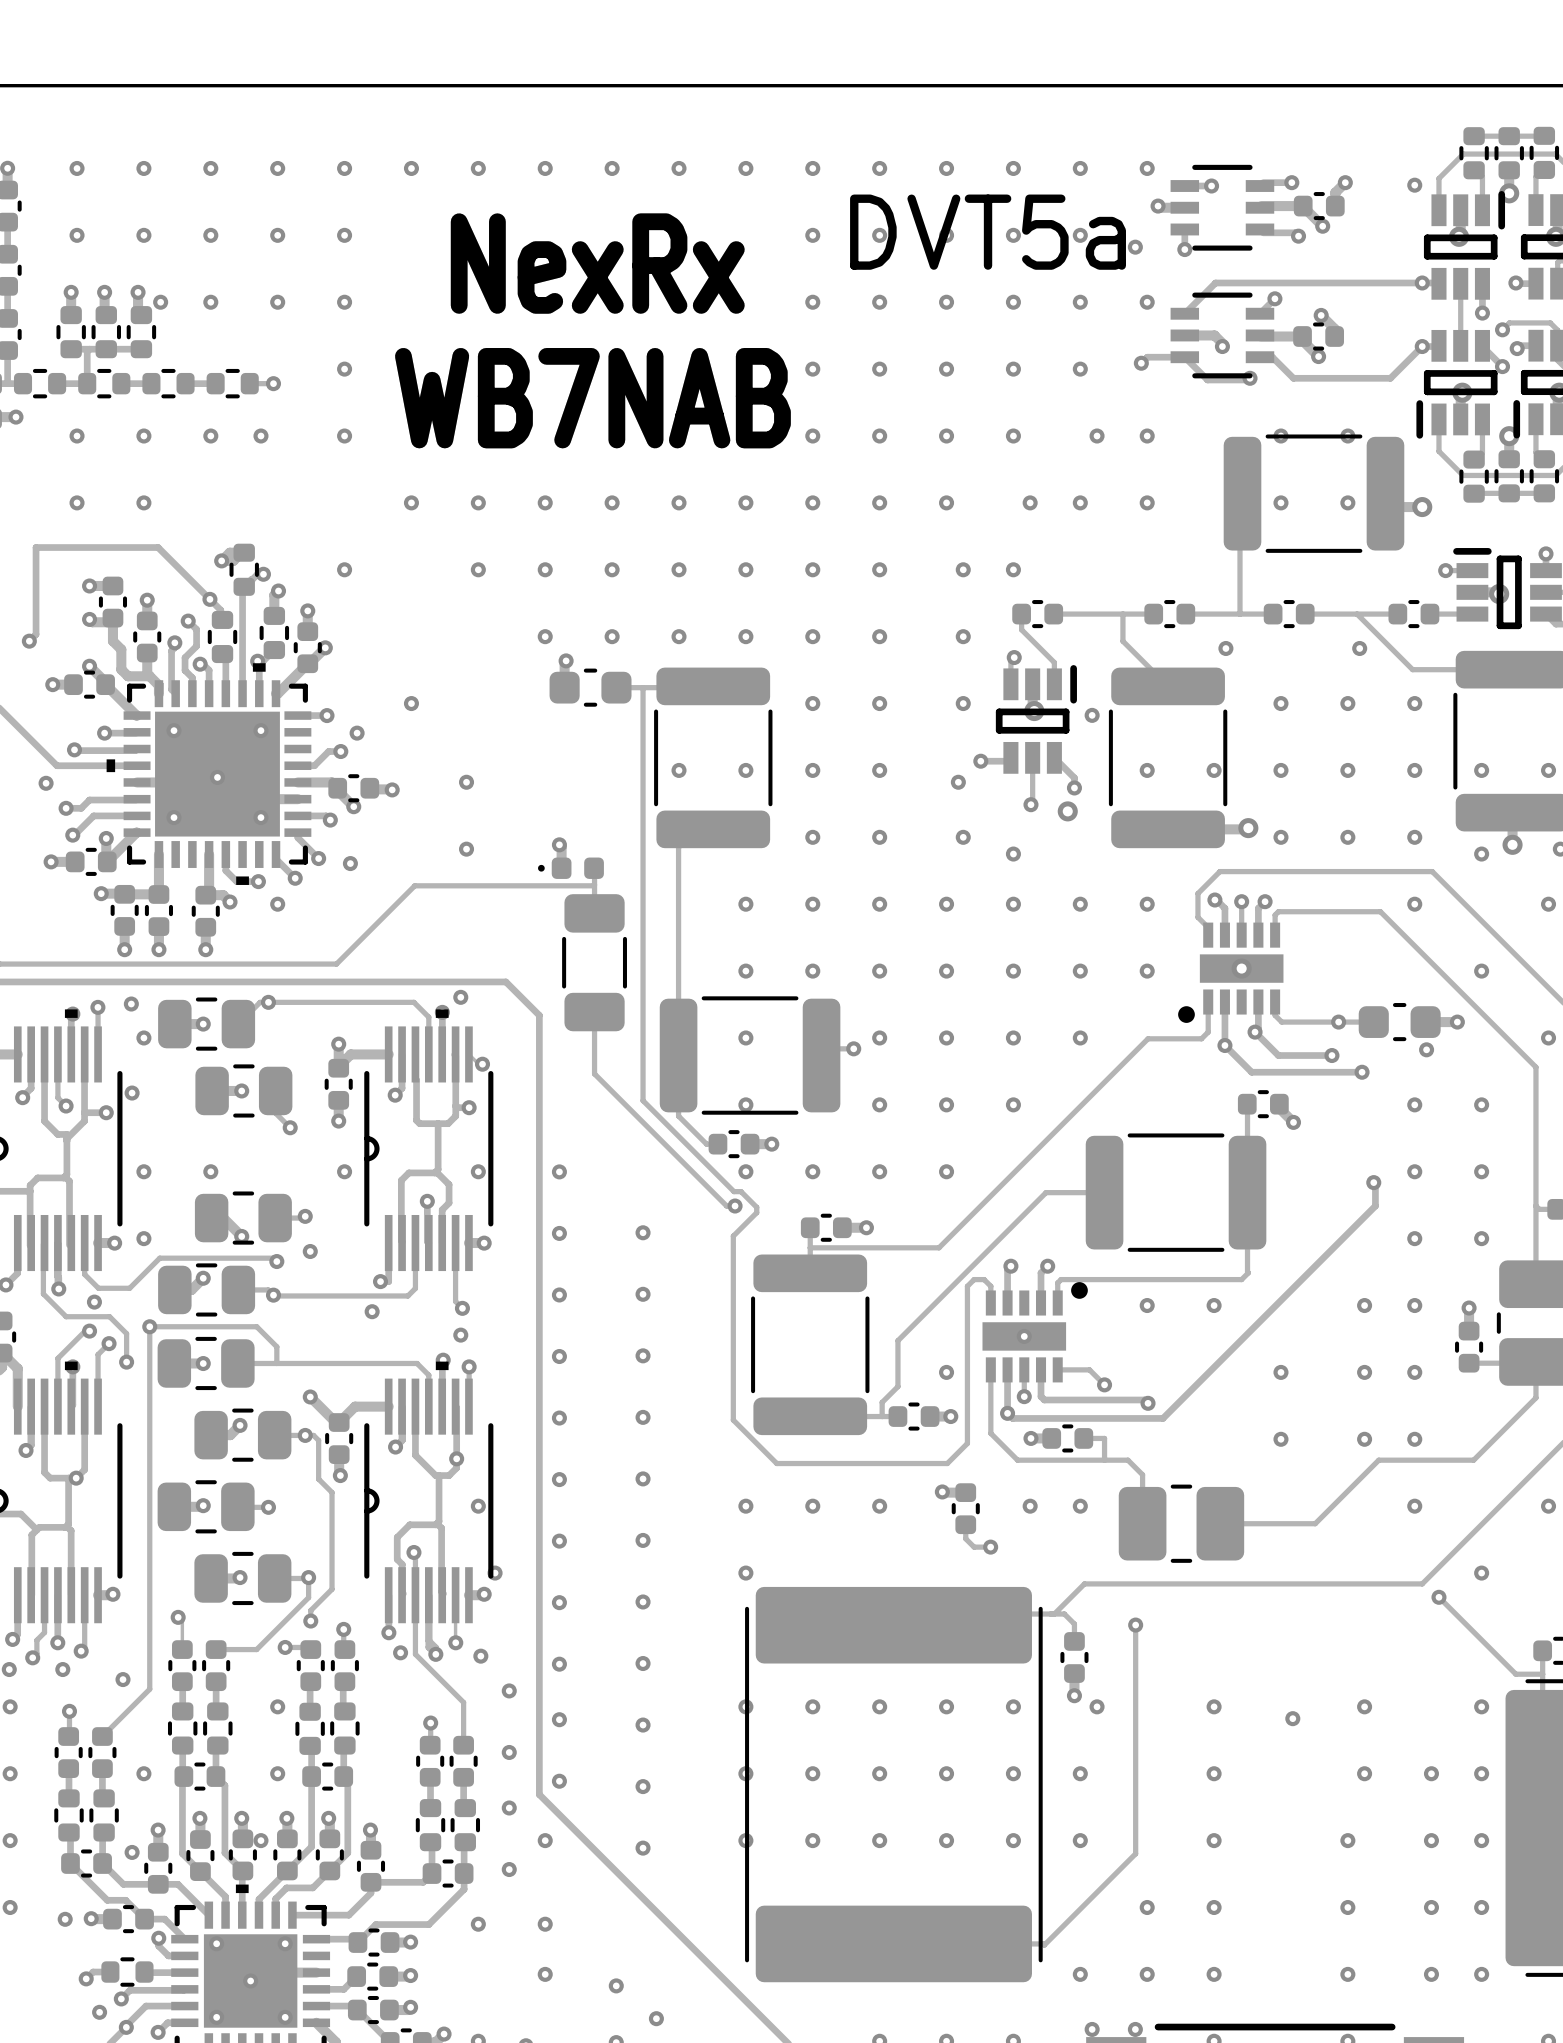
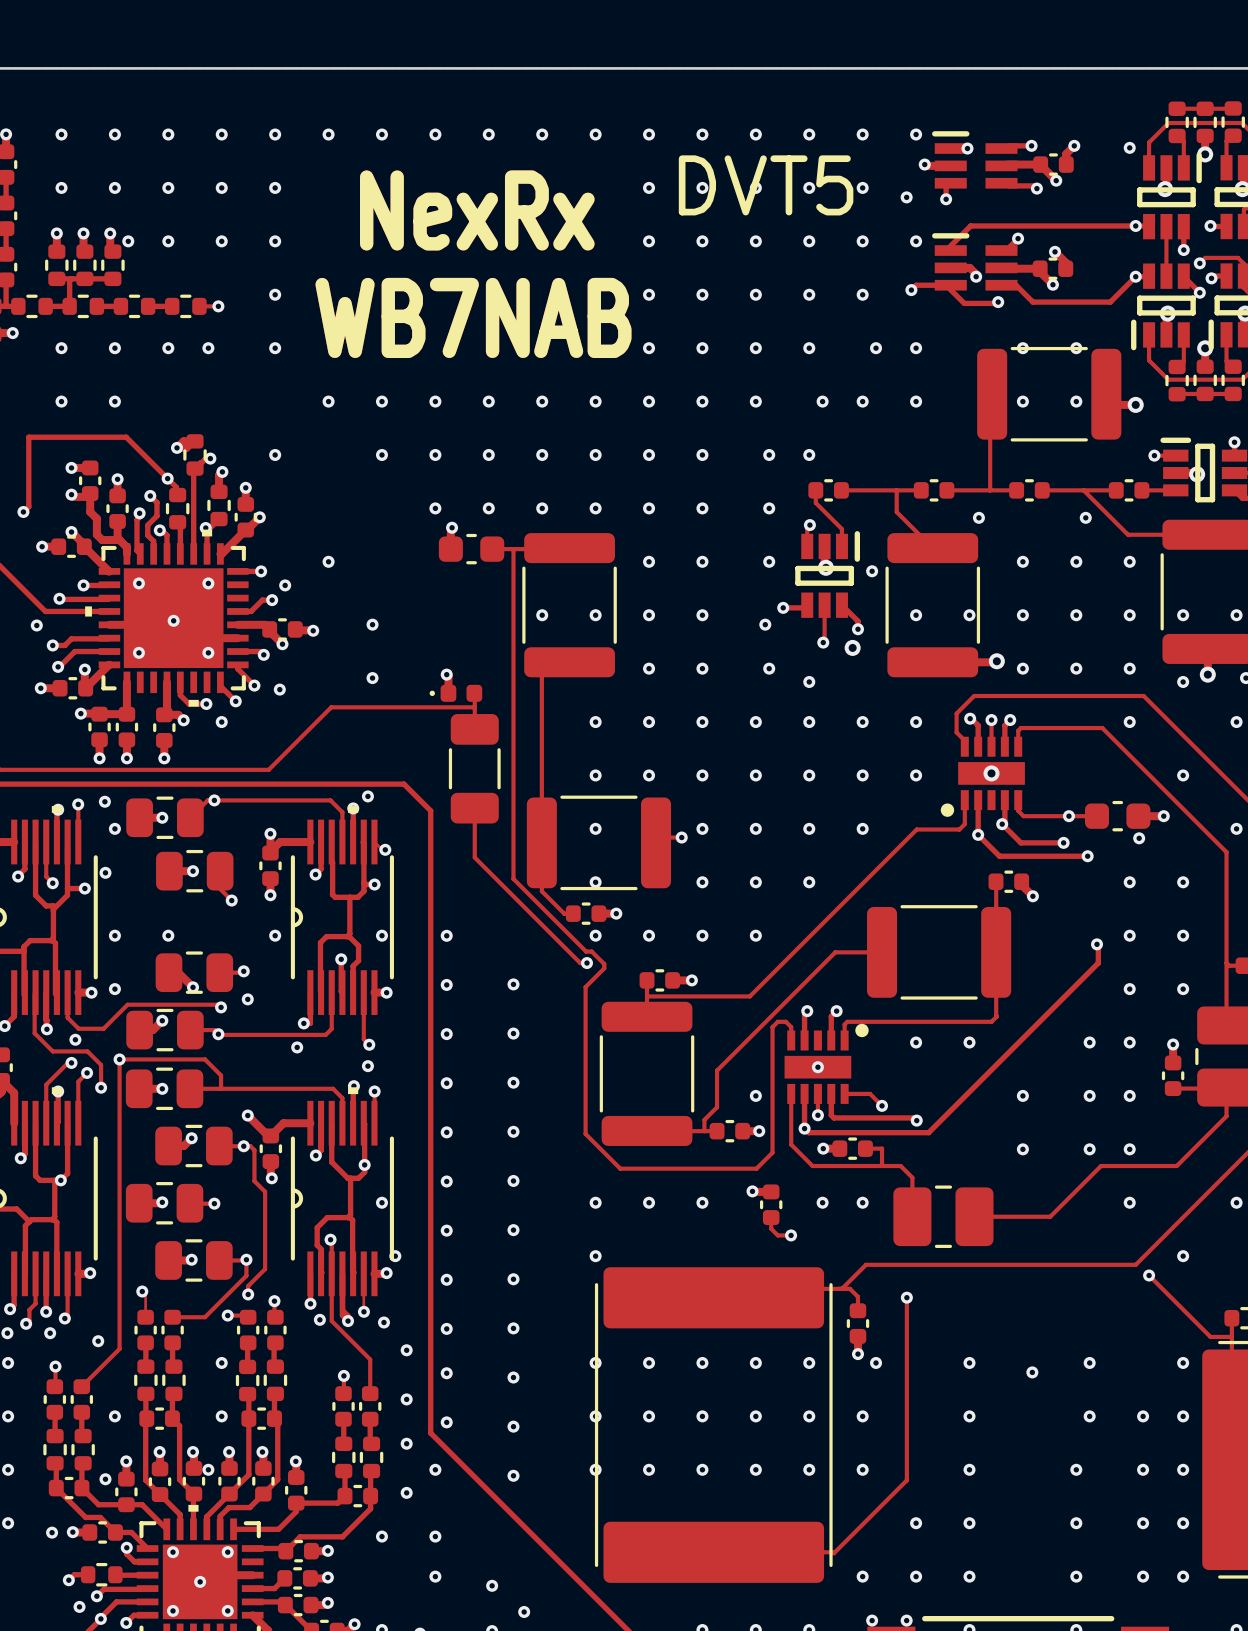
part footprint: [1170, 164, 1275, 251] -> [932, 131, 1018, 189]
text: DVT5a (988, 232) -> DVT5 (766, 185)
part footprint: [1170, 292, 1275, 379] -> [932, 233, 1018, 291]

